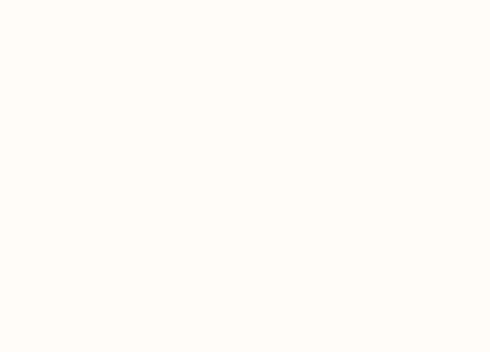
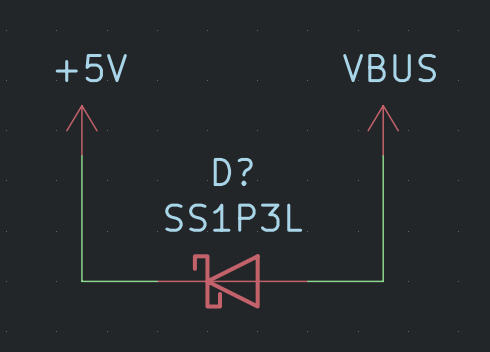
power symbol: none -> +5V (81, 130)
power symbol: none -> VBUS (383, 130)
wire: none -> (81, 155) (81, 281) (157, 281)
wire: none -> (383, 155) (383, 281) (307, 281)
D?: none -> SS1P3L (232, 281)

